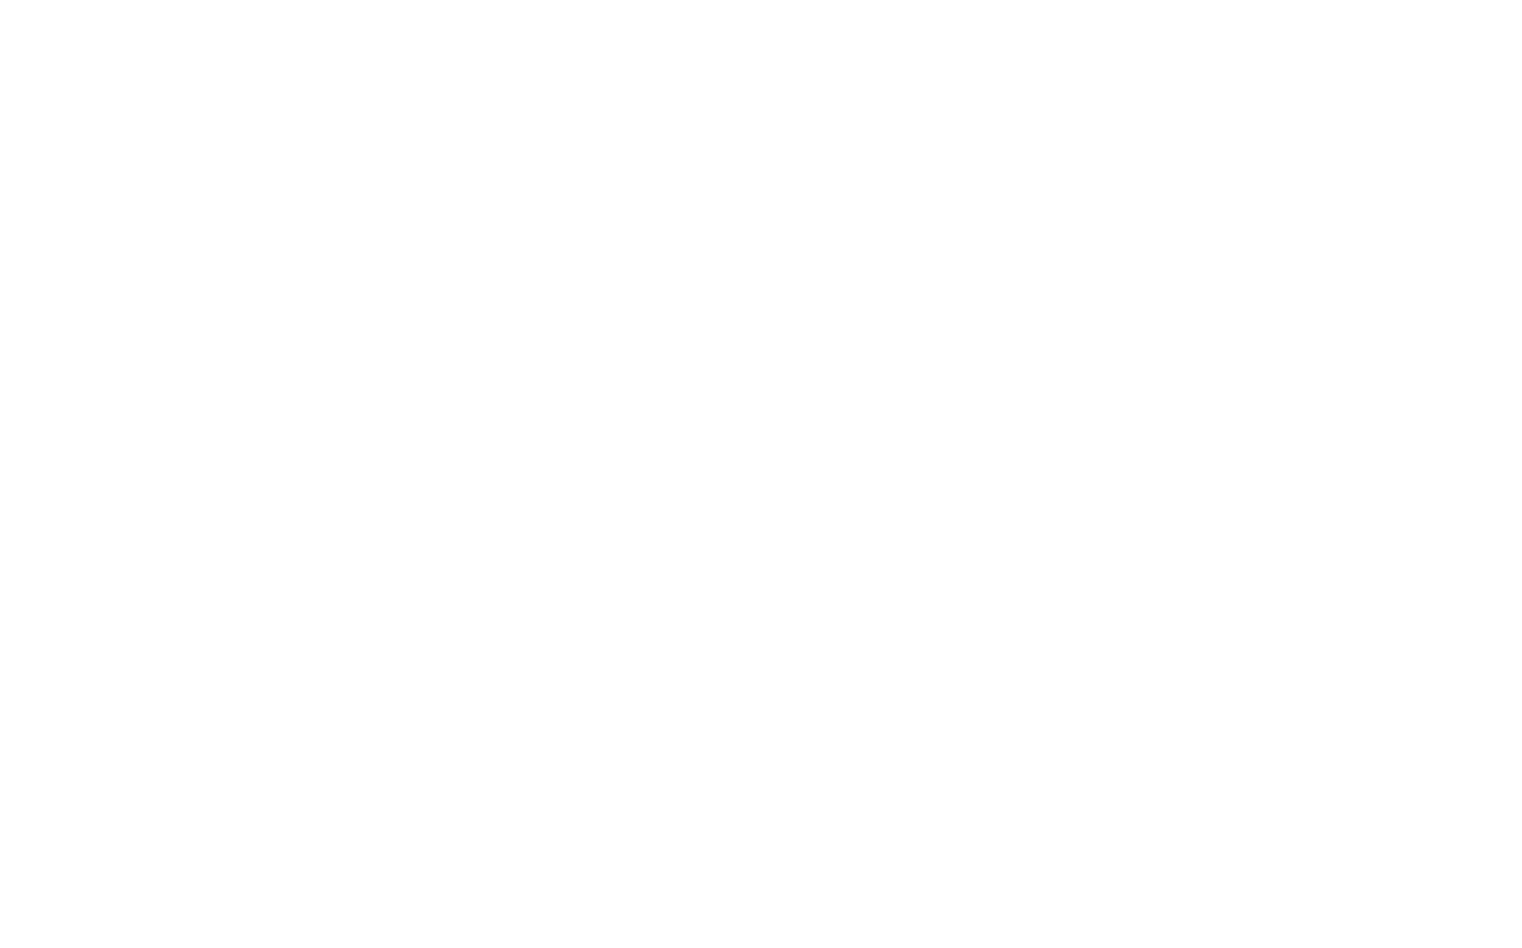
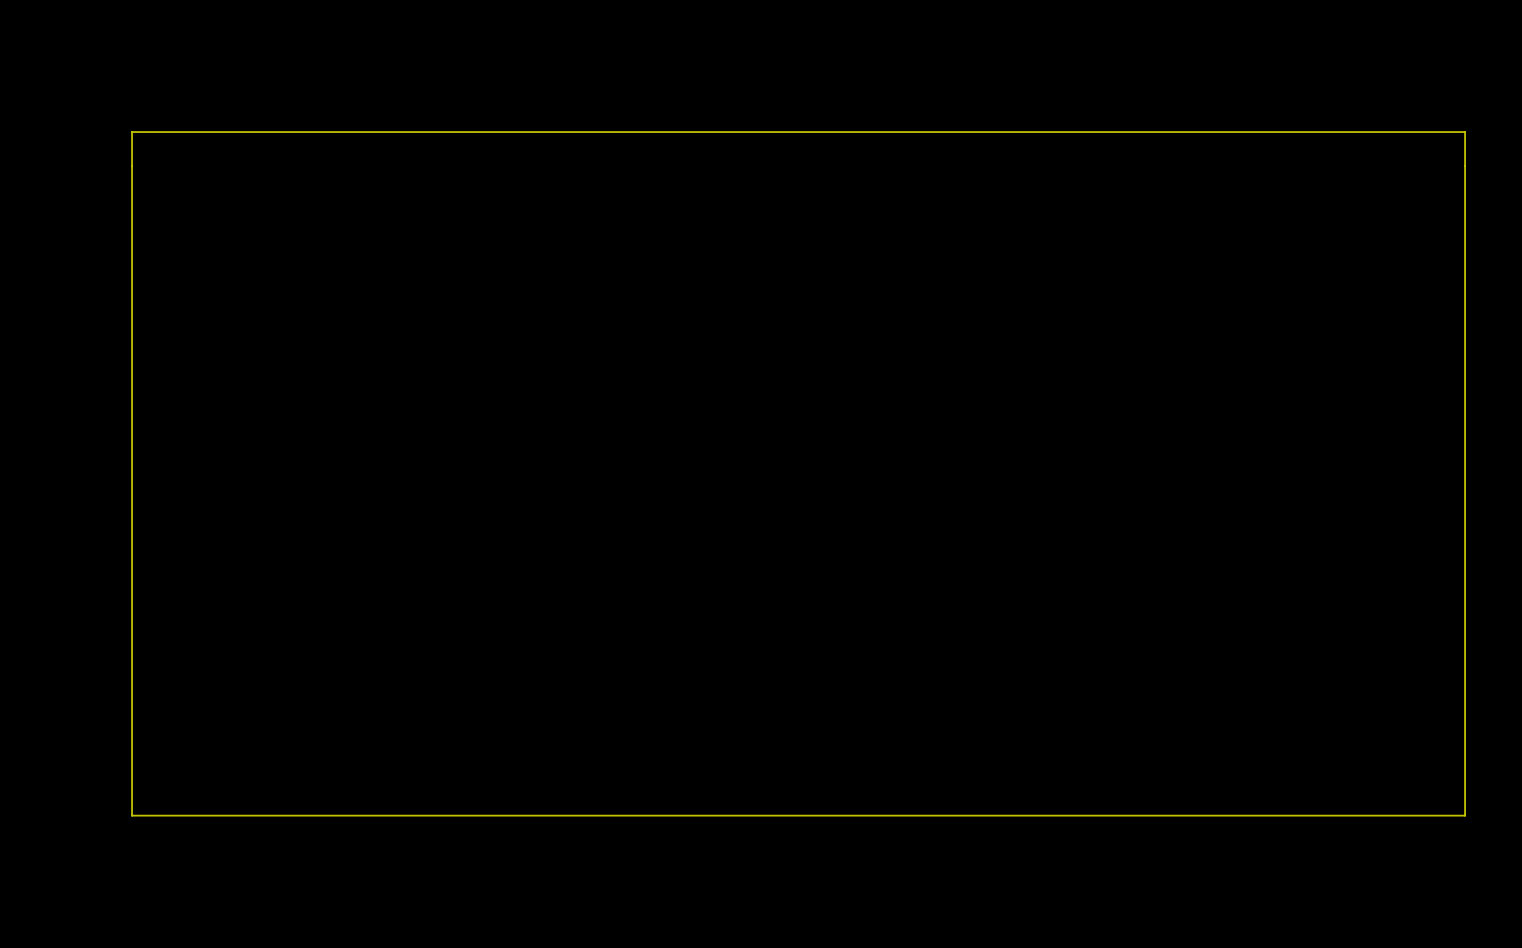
board edge: none -> (1465, 132) (1465, 815) (132, 815) (132, 132) (1465, 132)

